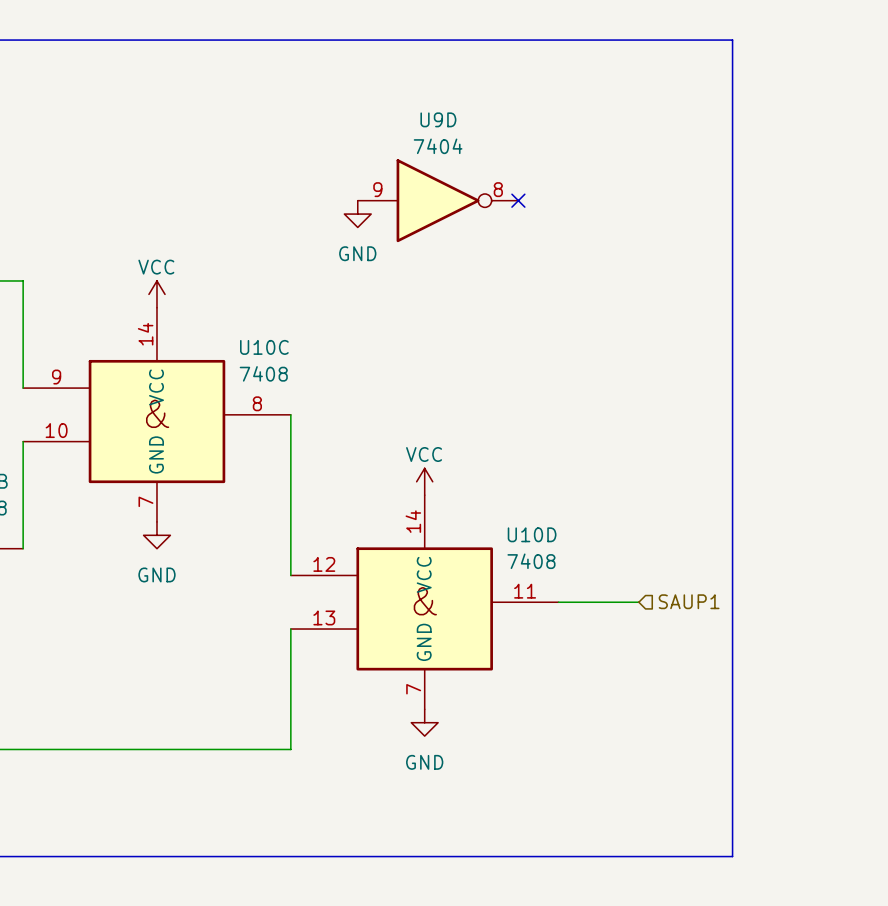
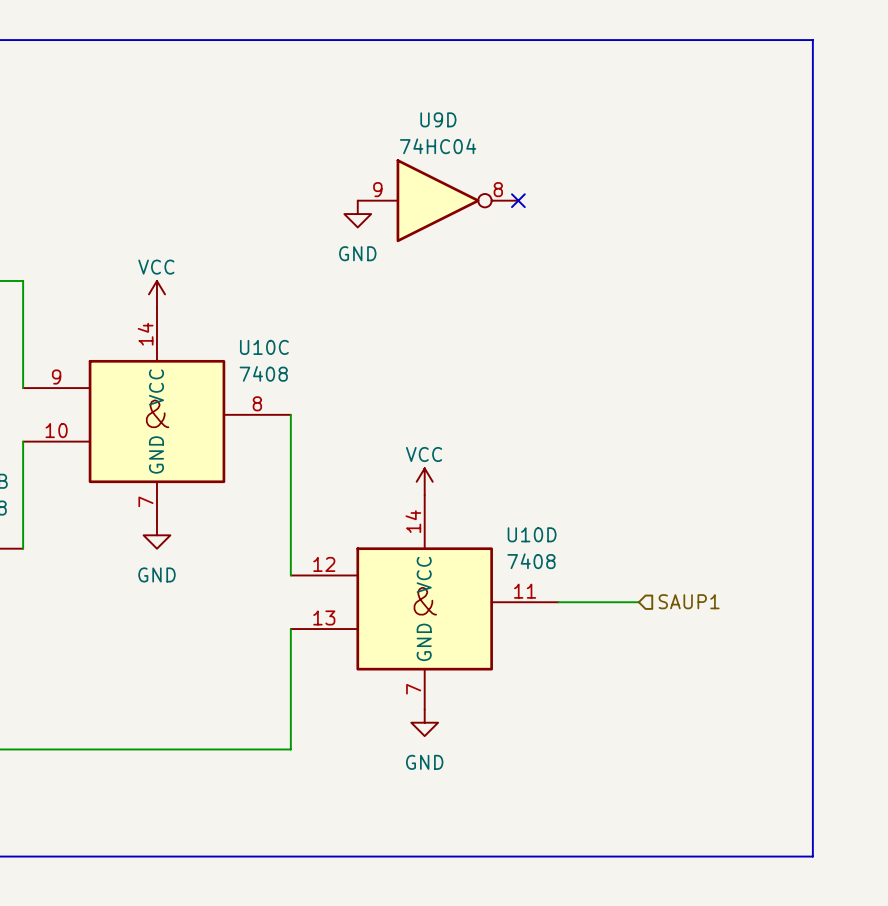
line: (732, 40) (732, 856) -> (732, 40) (812, 40) (812, 856) (732, 856)
U9D value: 7404 (438, 146) -> 74HC04 (438, 146)

